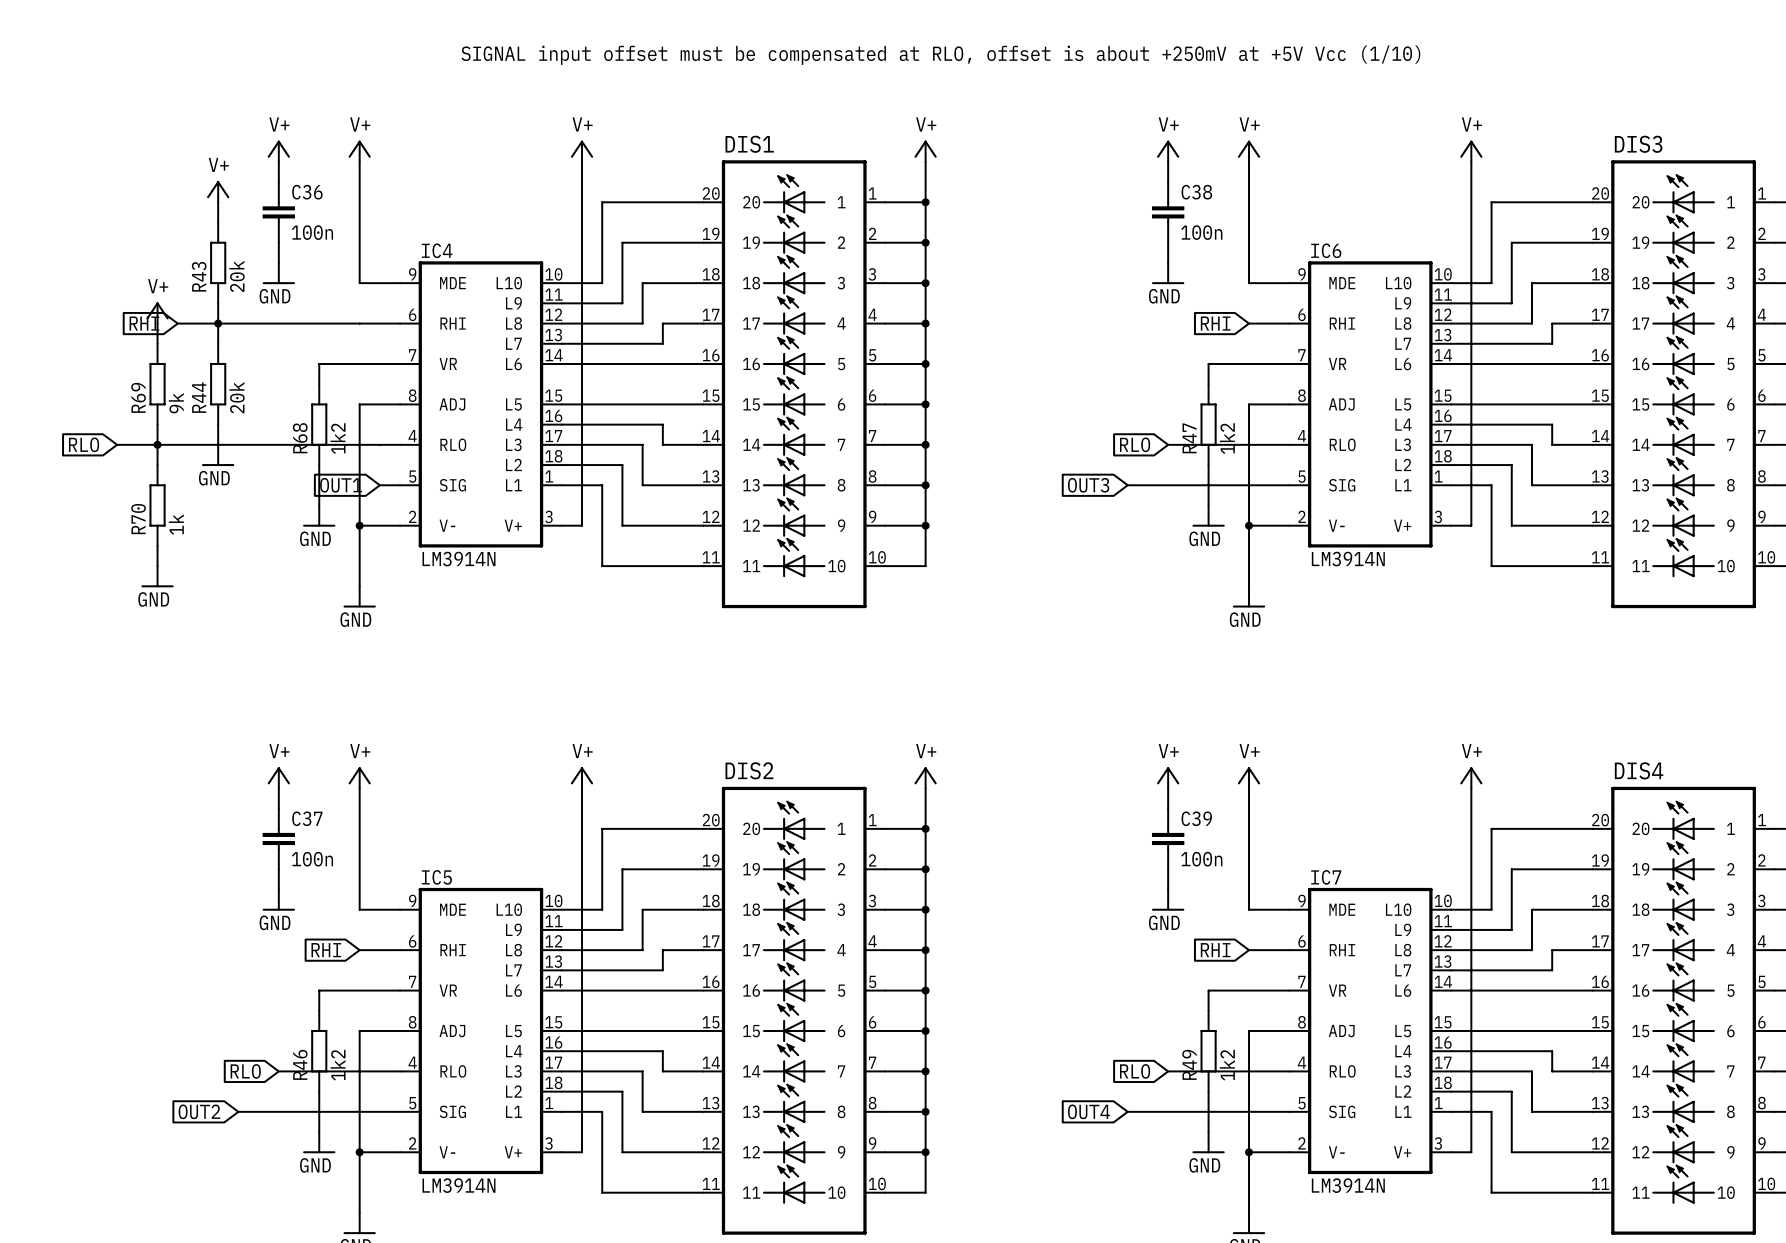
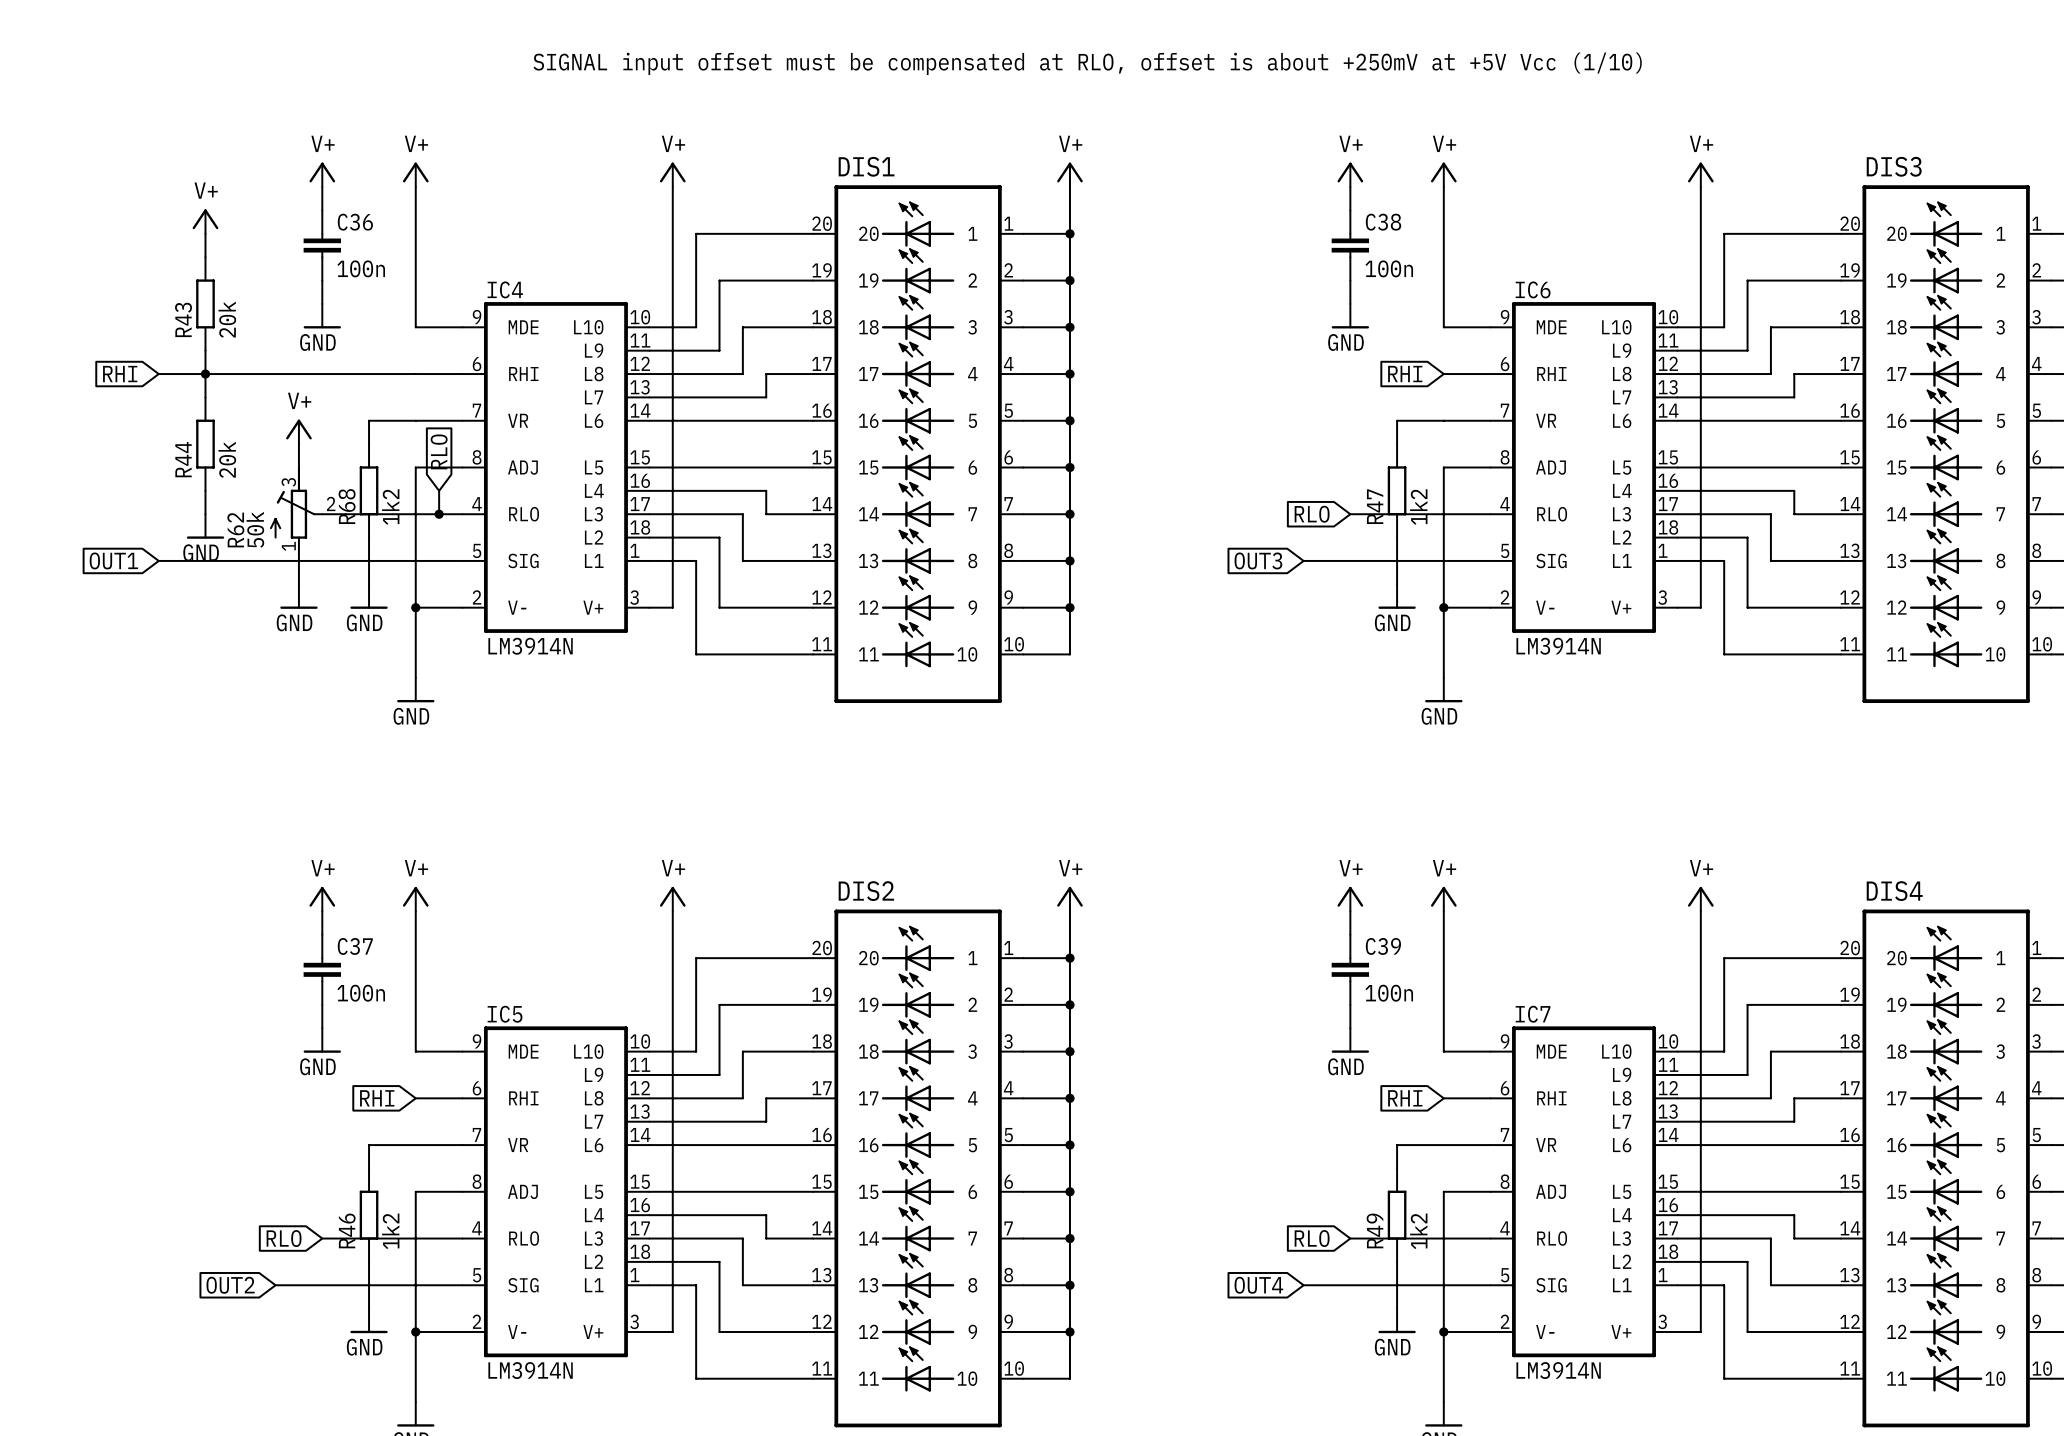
power symbol position: V+ (218, 191) -> V+ (205, 221)
wire: (218, 202) (218, 222) -> (205, 233) (205, 257)
R43 position: (218, 262) -> (205, 303)
wire: (218, 303) (218, 343) -> (205, 350) (205, 397)
power symbol: V+ (157, 312) -> none
wire: none -> (158, 374) (205, 374)
global label position: RHI (144, 323) -> RHI (120, 374)
wire: (157, 323) (157, 343) -> (298, 444) (298, 467)
junction position: (218, 323) -> (205, 374)
power symbol: none -> V+ (298, 431)
R69: 9k (157, 384) -> none
R44 position: (218, 384) -> (205, 444)
global label: none -> RLO (439, 451)
wire: (157, 424) (157, 465) -> none
wire: (218, 424) (218, 444) -> (205, 490) (205, 514)
wire: none -> (439, 490) (439, 514)
global label: RLO (84, 444) -> none
wire: (117, 444) (299, 444) -> none
junction: (157, 444) -> none
R62: none -> 50k (307, 513)
junction: none -> (439, 514)
power symbol: none -> GND (205, 526)
power symbol: GND (218, 455) -> none
global label: none -> OUT1 (113, 560)
wire: none -> (158, 560) (439, 560)
global label: OUT1 (341, 485) -> none
R70: 1k (157, 505) -> none
power symbol: none -> GND (298, 596)
wire: (157, 545) (157, 566) -> (298, 560) (298, 584)
power symbol: GND (157, 576) -> none

